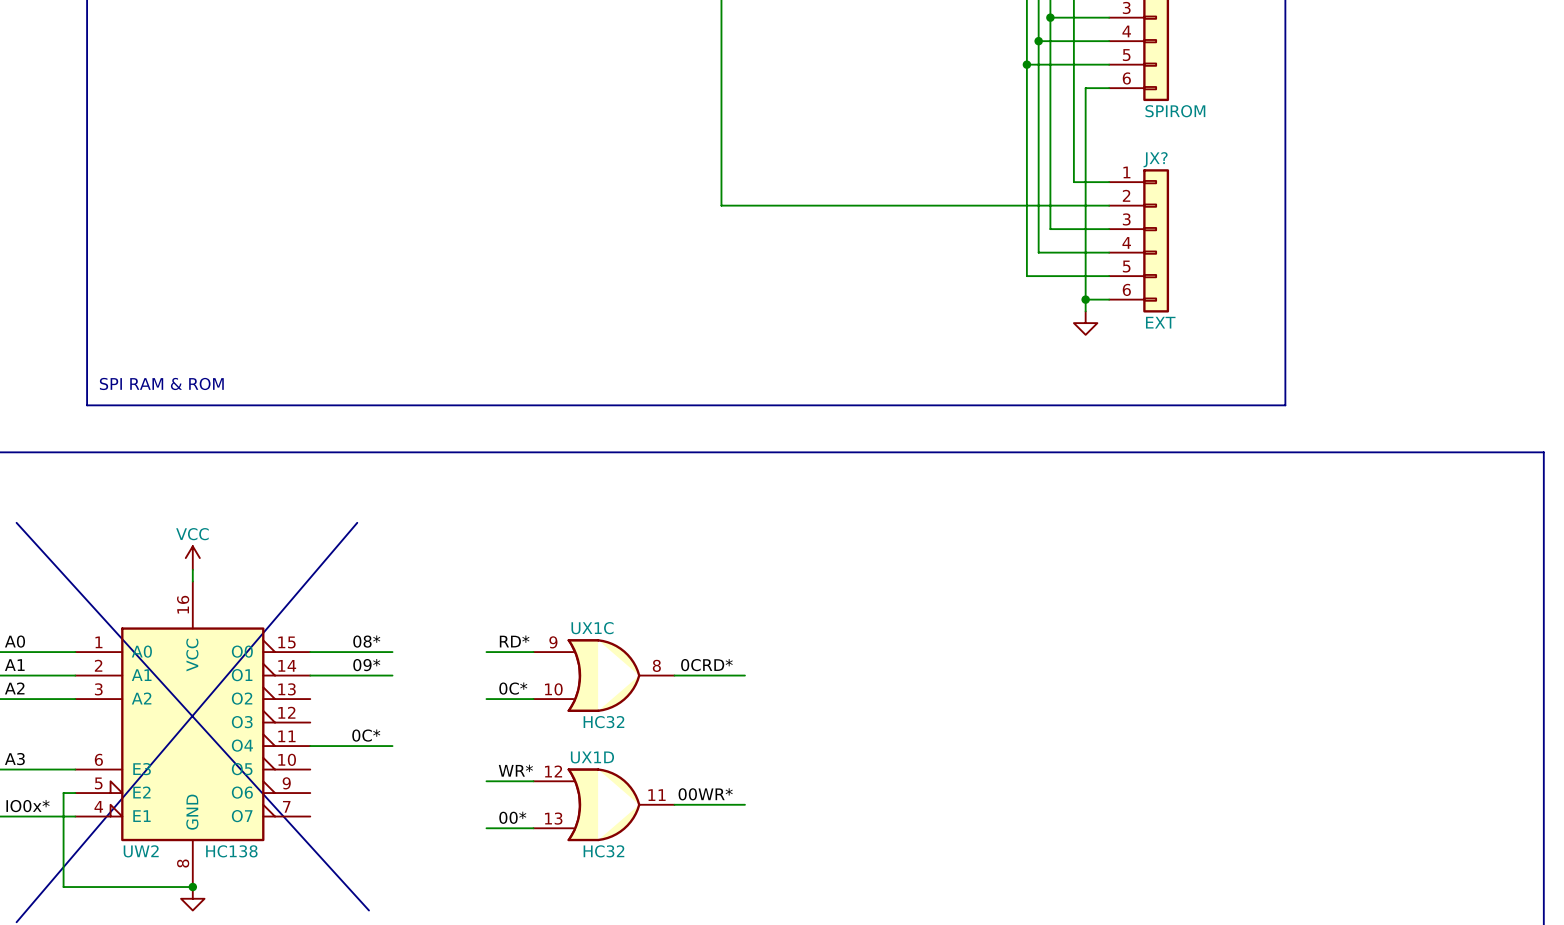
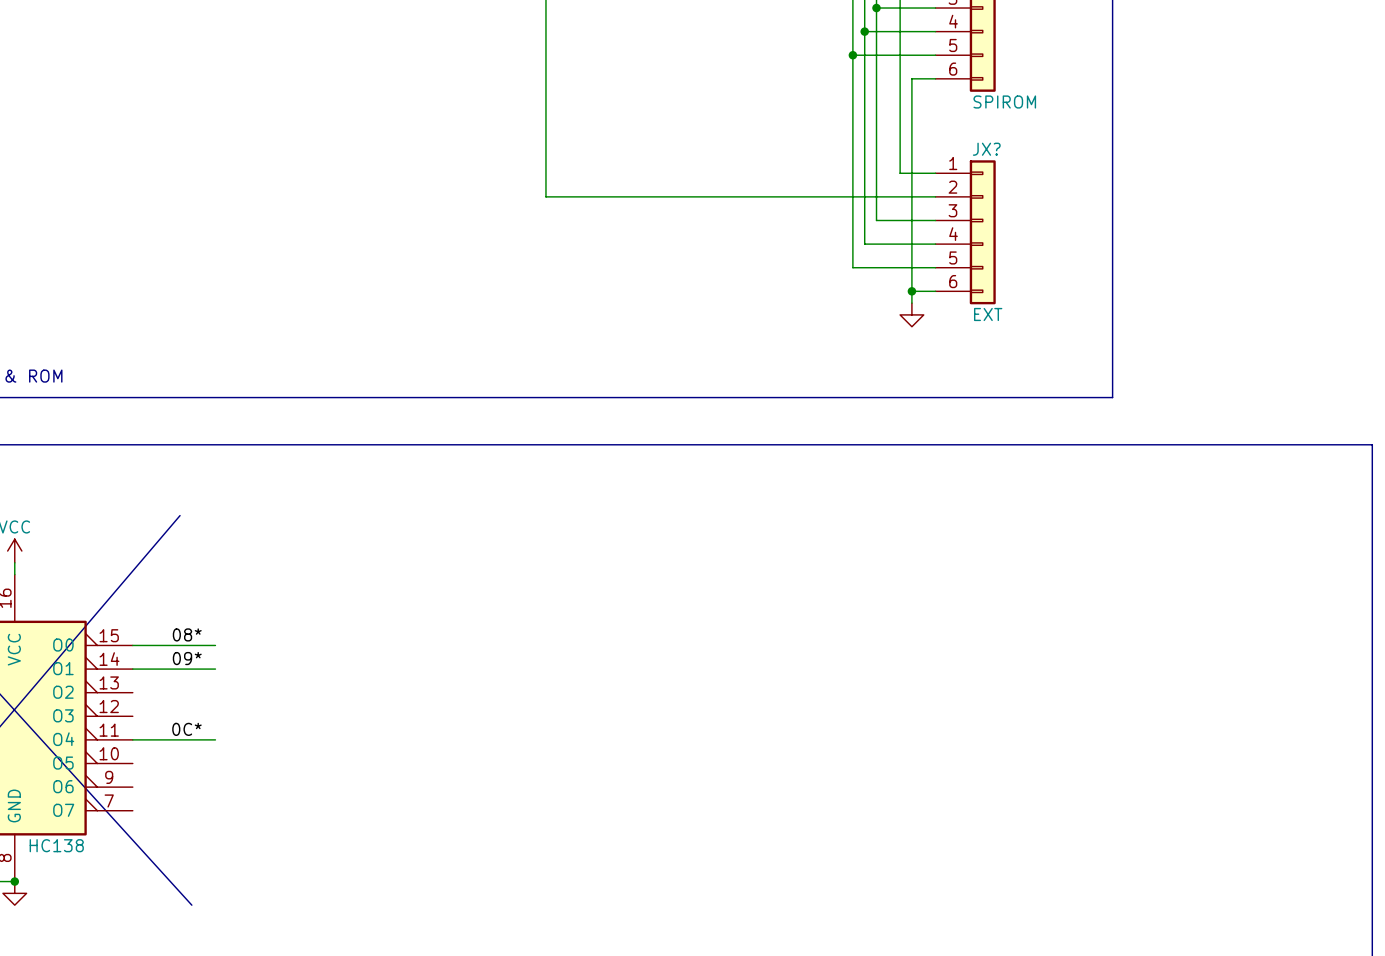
label: RD* (514, 641) -> none
wire: (486, 652) (533, 652) -> none
label: 0CRD* (706, 665) -> none
UX1C: HC32 (603, 675) -> none
wire: (674, 675) (744, 675) -> none
label: 0C* (513, 688) -> none
wire: (486, 699) (533, 699) -> none
label: WR* (515, 770) -> none
wire: (486, 781) (533, 781) -> none
label: 00WR* (705, 794) -> none
UX1D: HC32 (603, 804) -> none
wire: (674, 804) (744, 804) -> none
label: 00* (512, 817) -> none
wire: (486, 828) (533, 828) -> none

